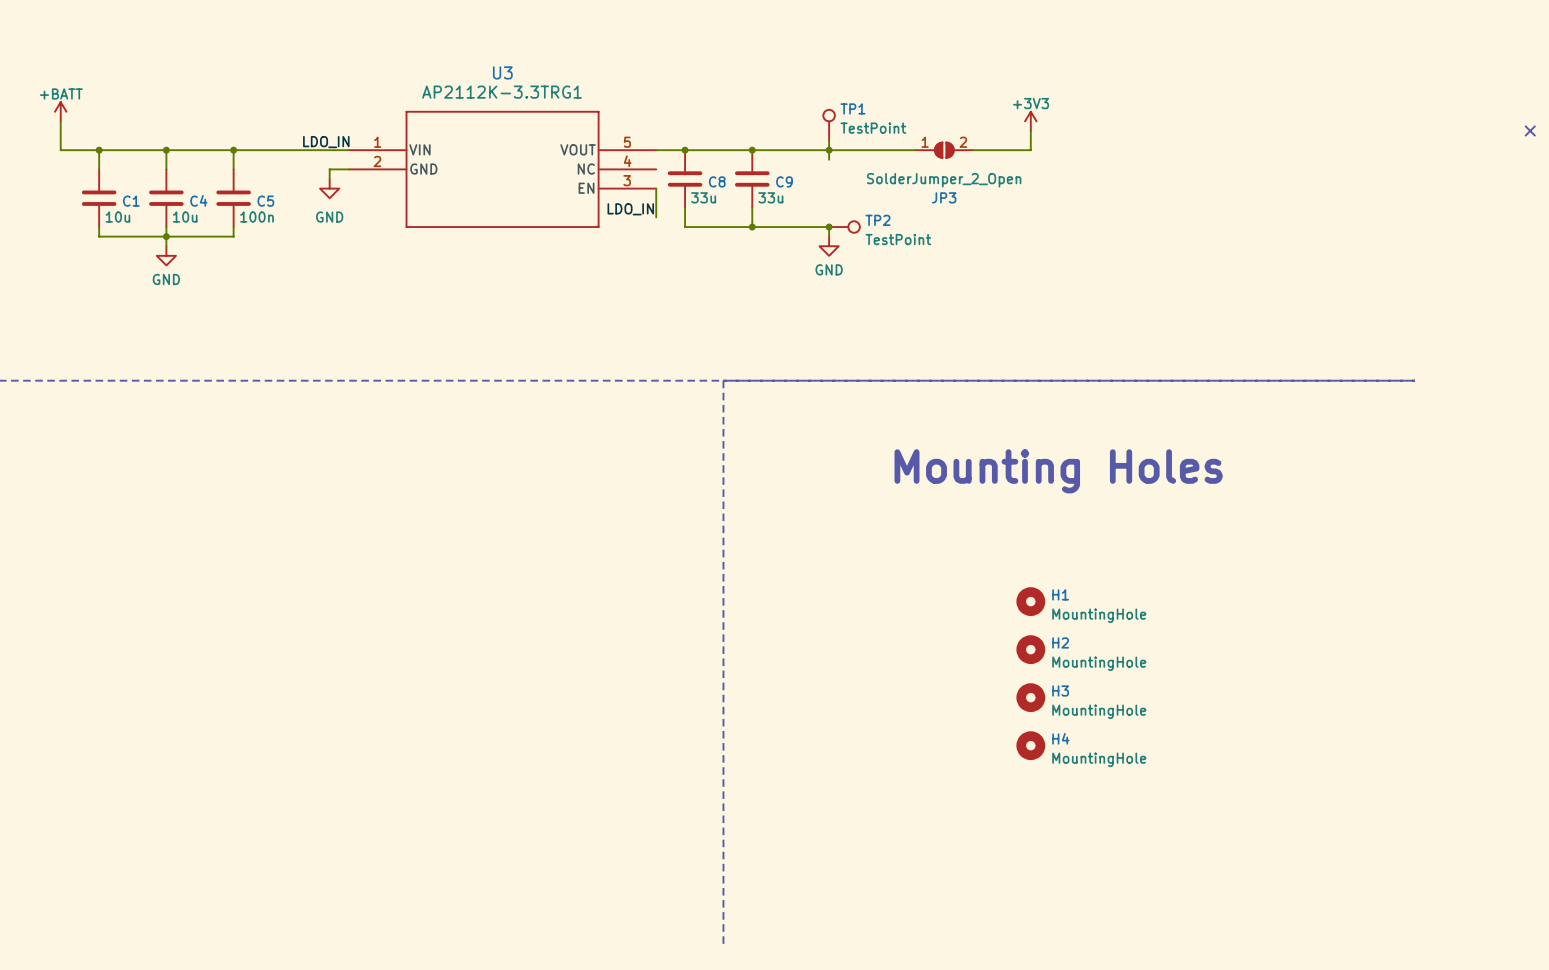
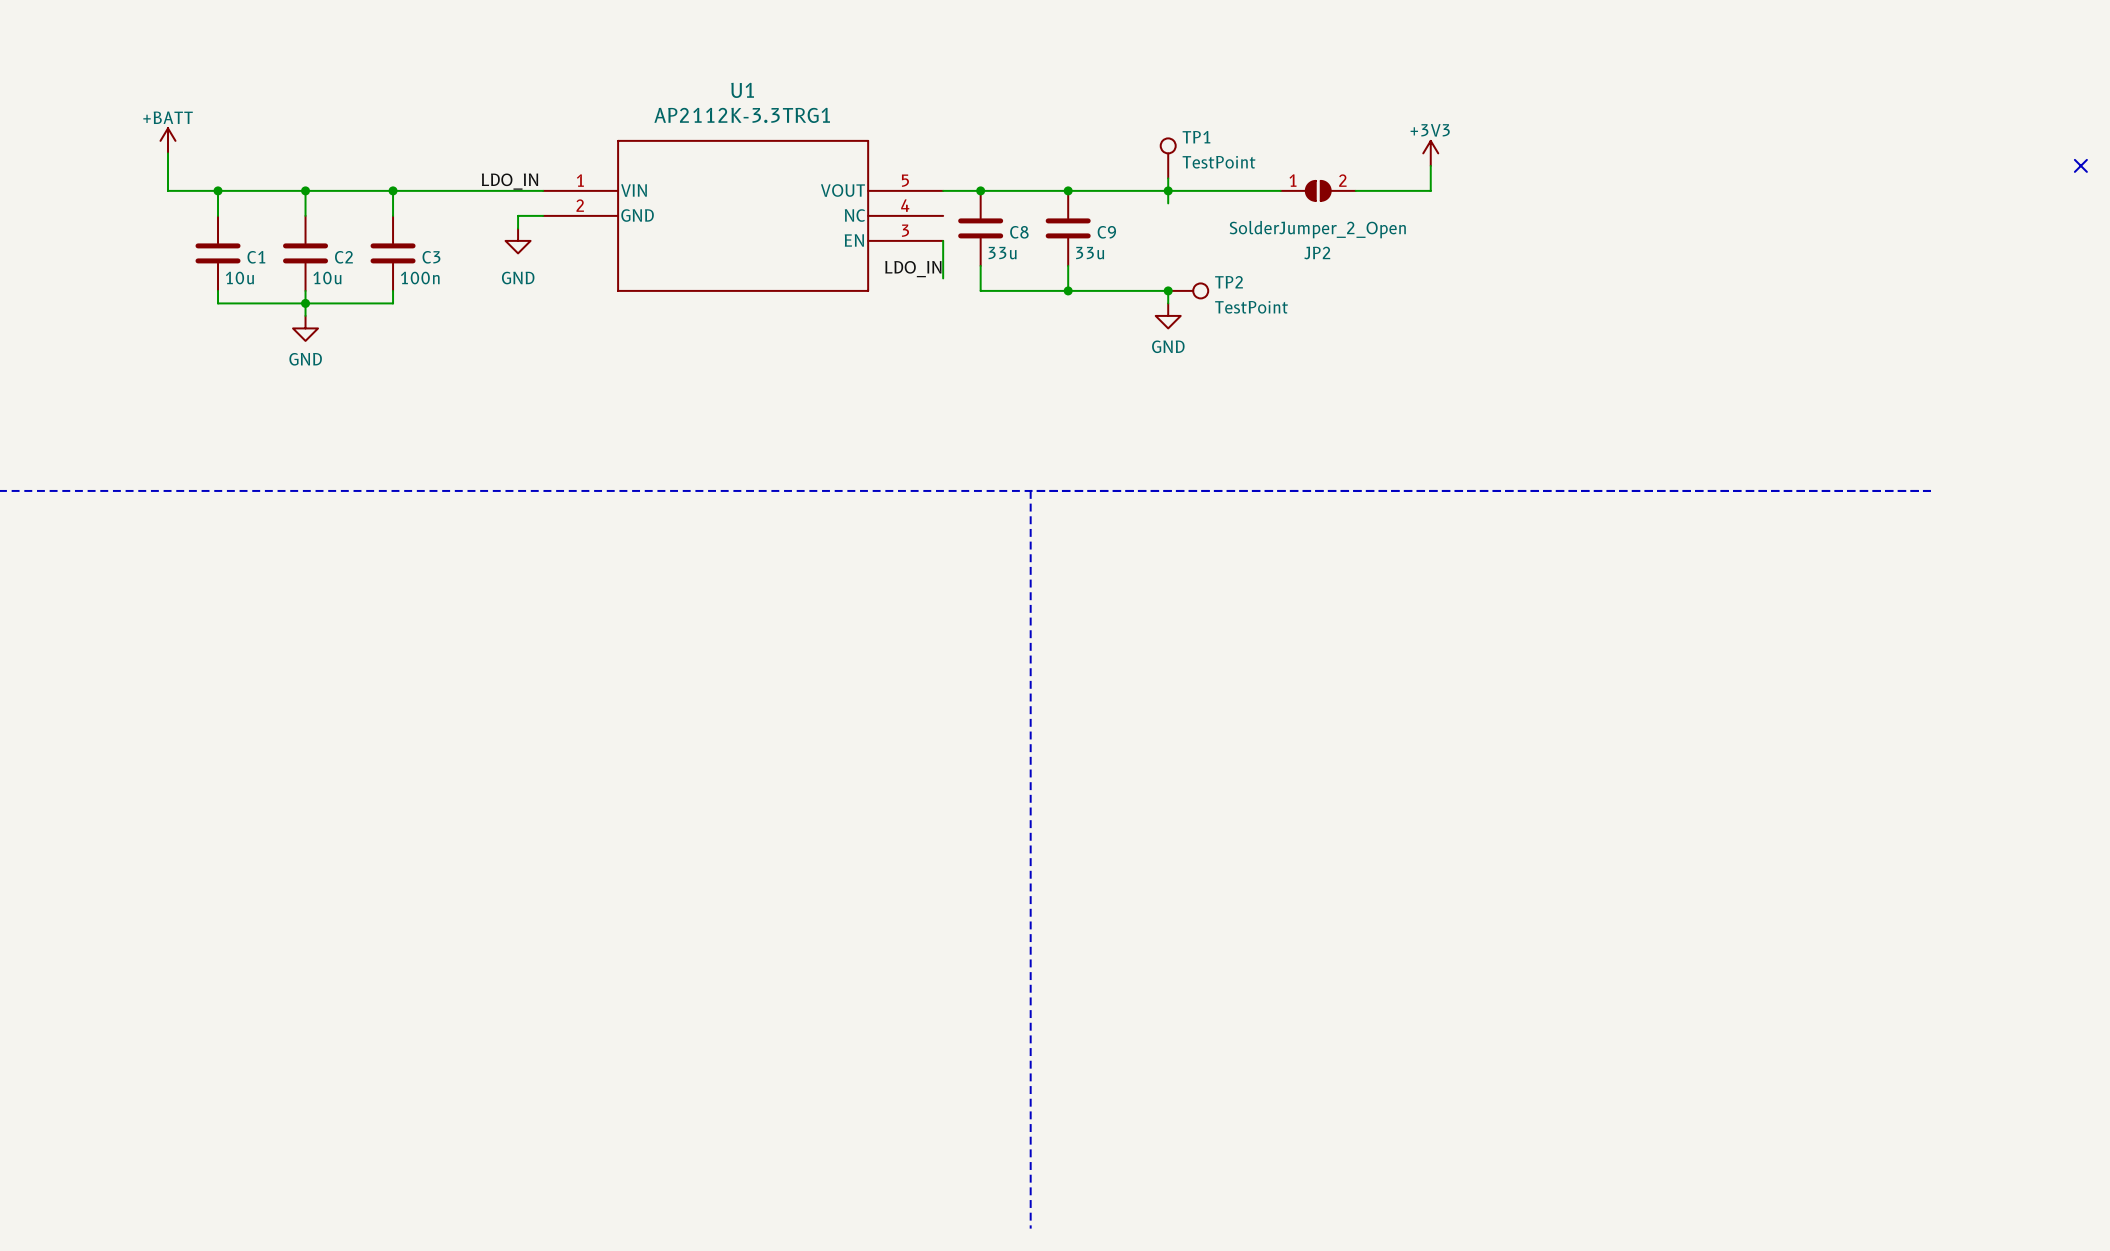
U3 name: U3 (502, 72) -> U1 (742, 90)
JP3 name: JP3 (944, 197) -> JP2 (1317, 253)
C4 name: C4 (198, 200) -> C2 (343, 257)
C5 name: C5 (265, 201) -> C3 (431, 257)
text: Mounting Holes (1058, 471) -> none
H1: MountingHole (1030, 601) -> none
H2: MountingHole (1030, 649) -> none
H3: MountingHole (1030, 697) -> none
H4: MountingHole (1030, 745) -> none

